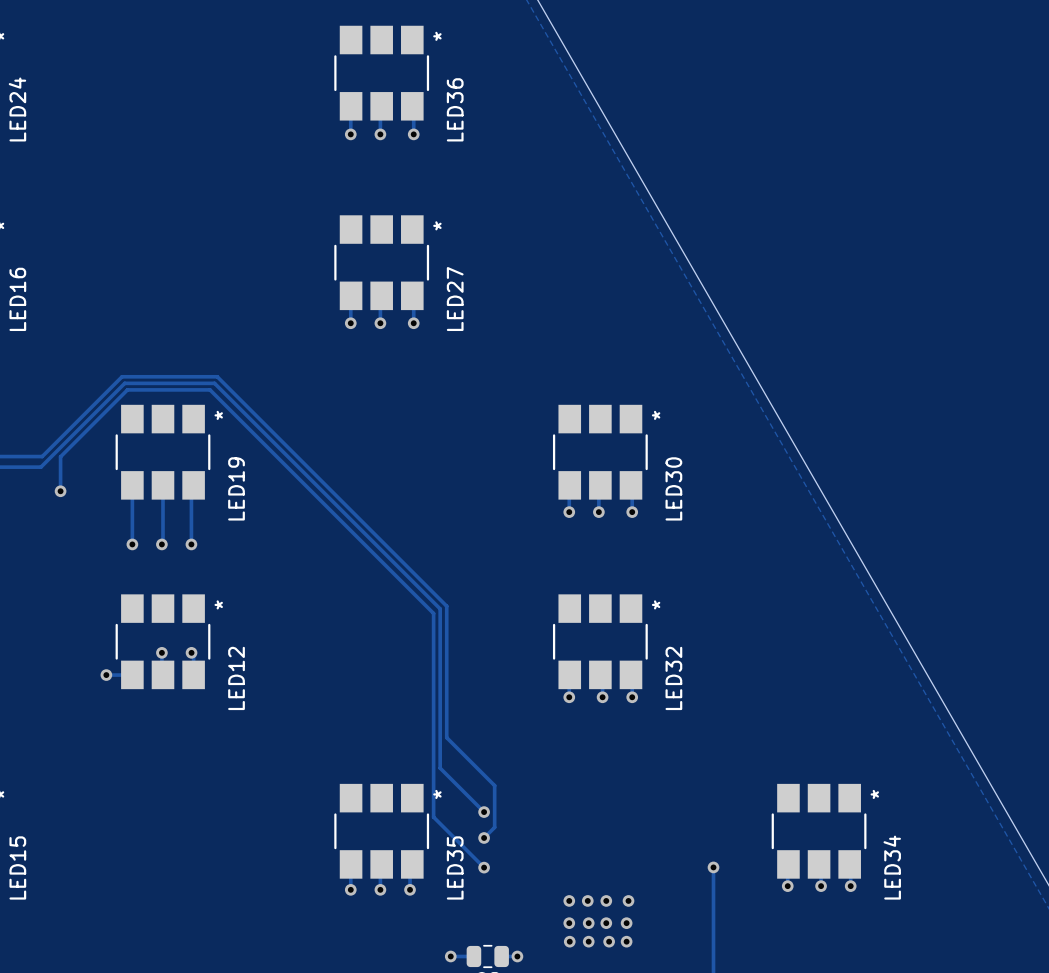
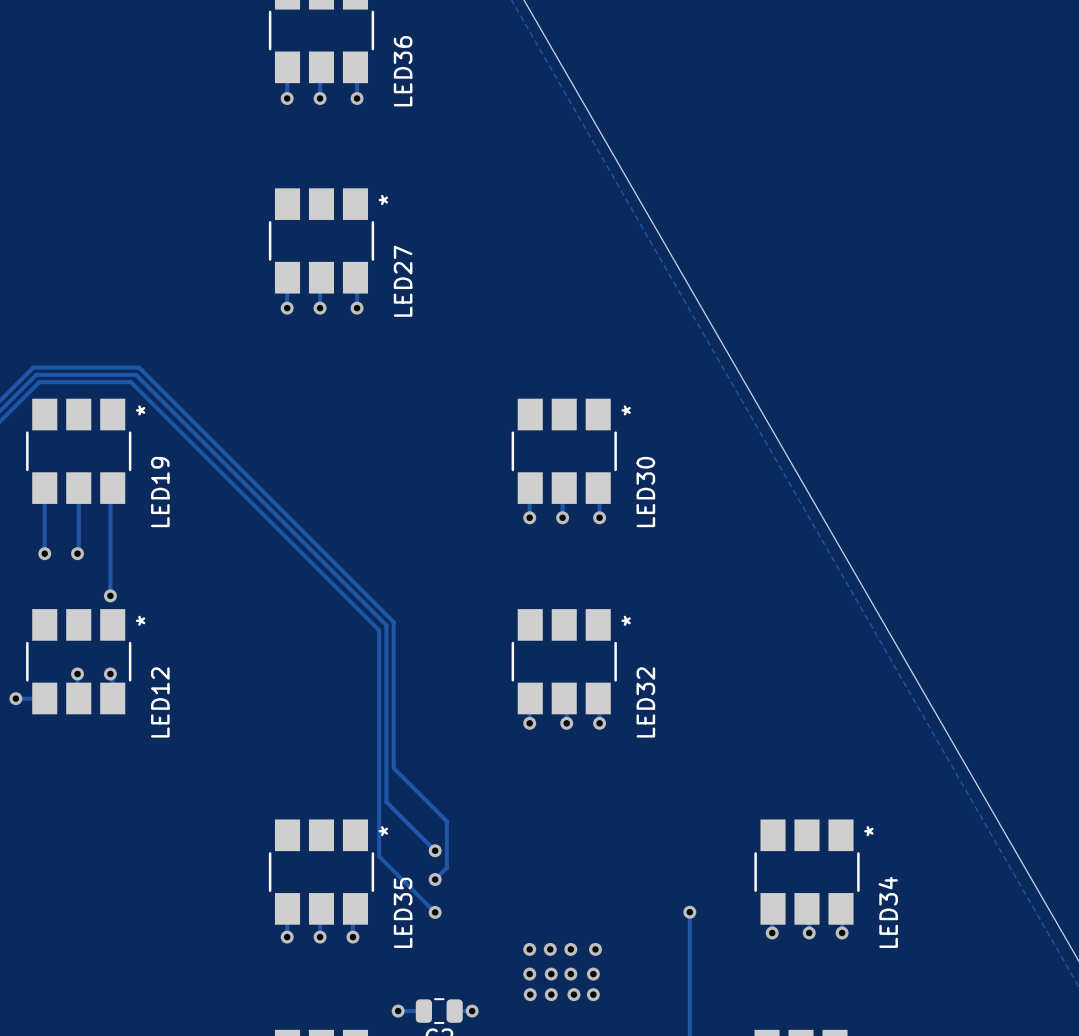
track: (191, 487) (191, 544) -> (110, 490) (110, 595)
via position: (191, 544) -> (110, 595)

